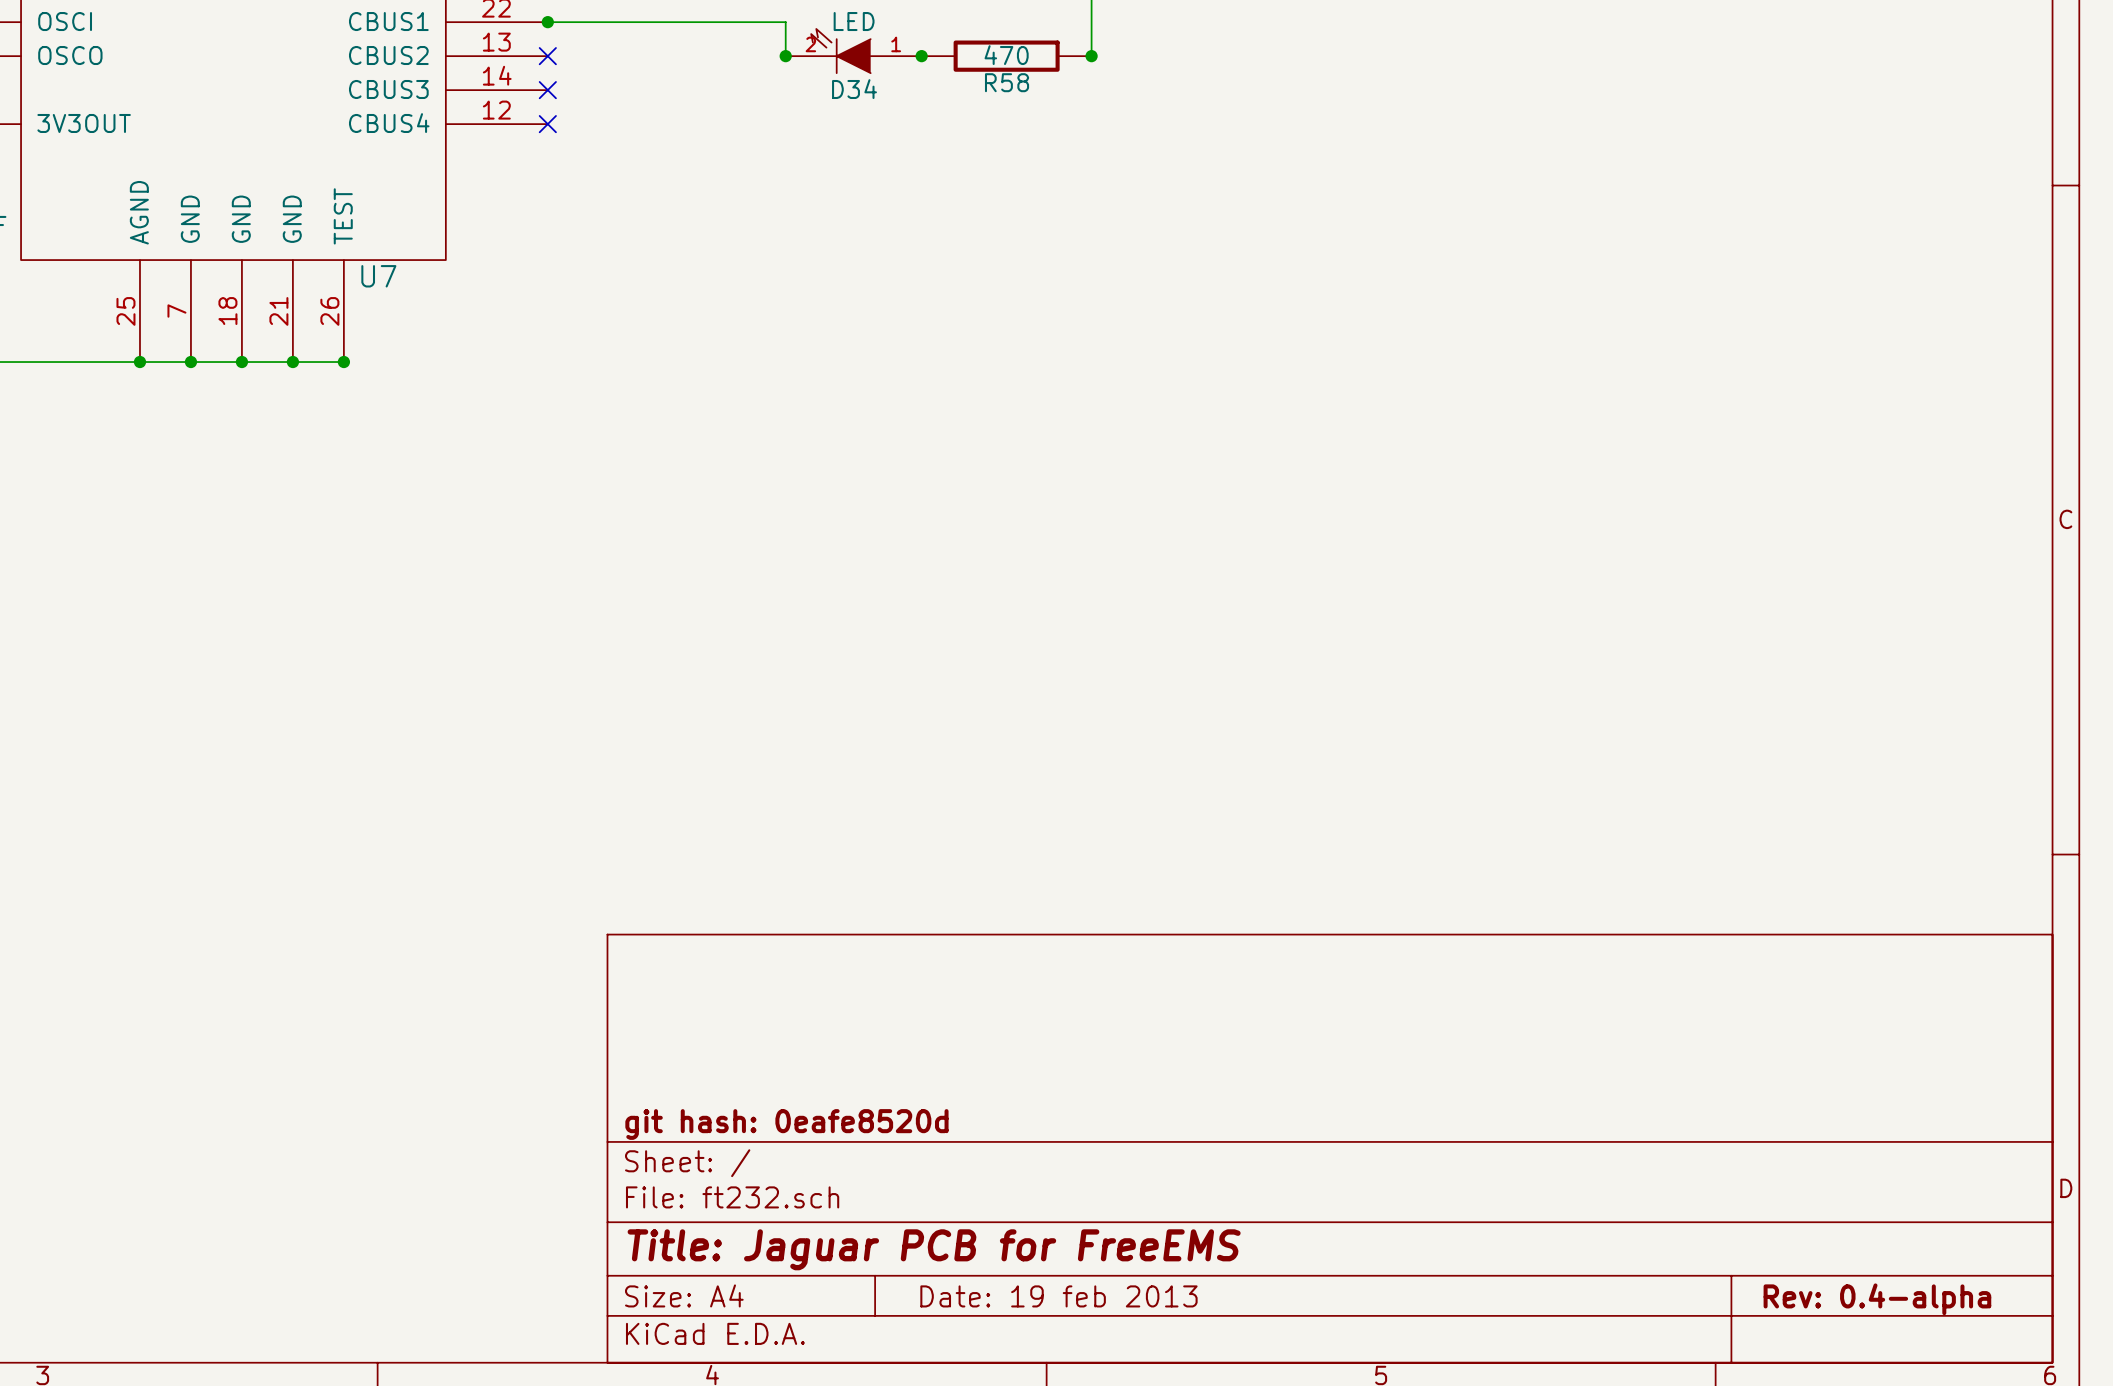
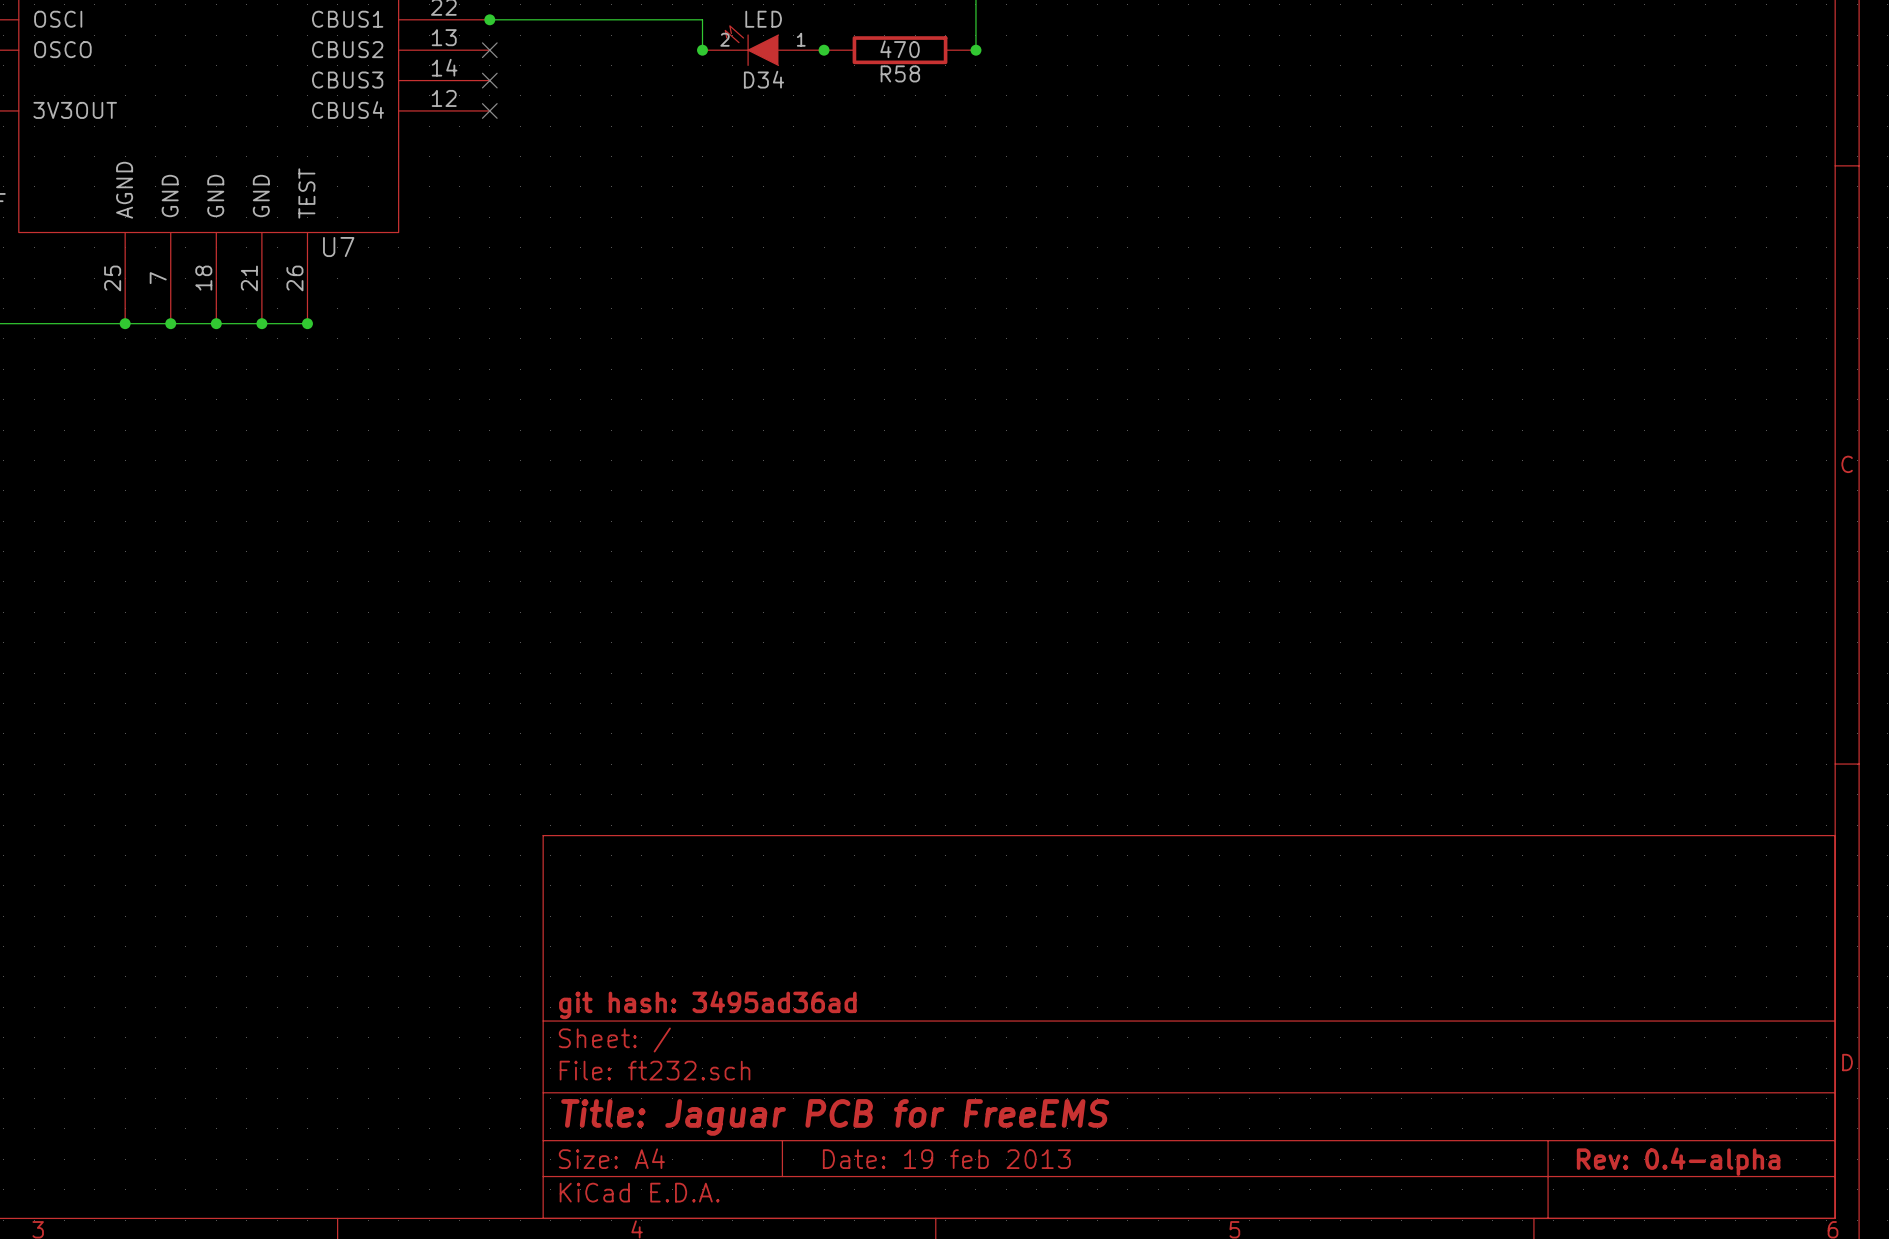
title block: git hash: 0eafe8520d (786, 1124) -> git hash: 3495ad36ad (707, 1004)

